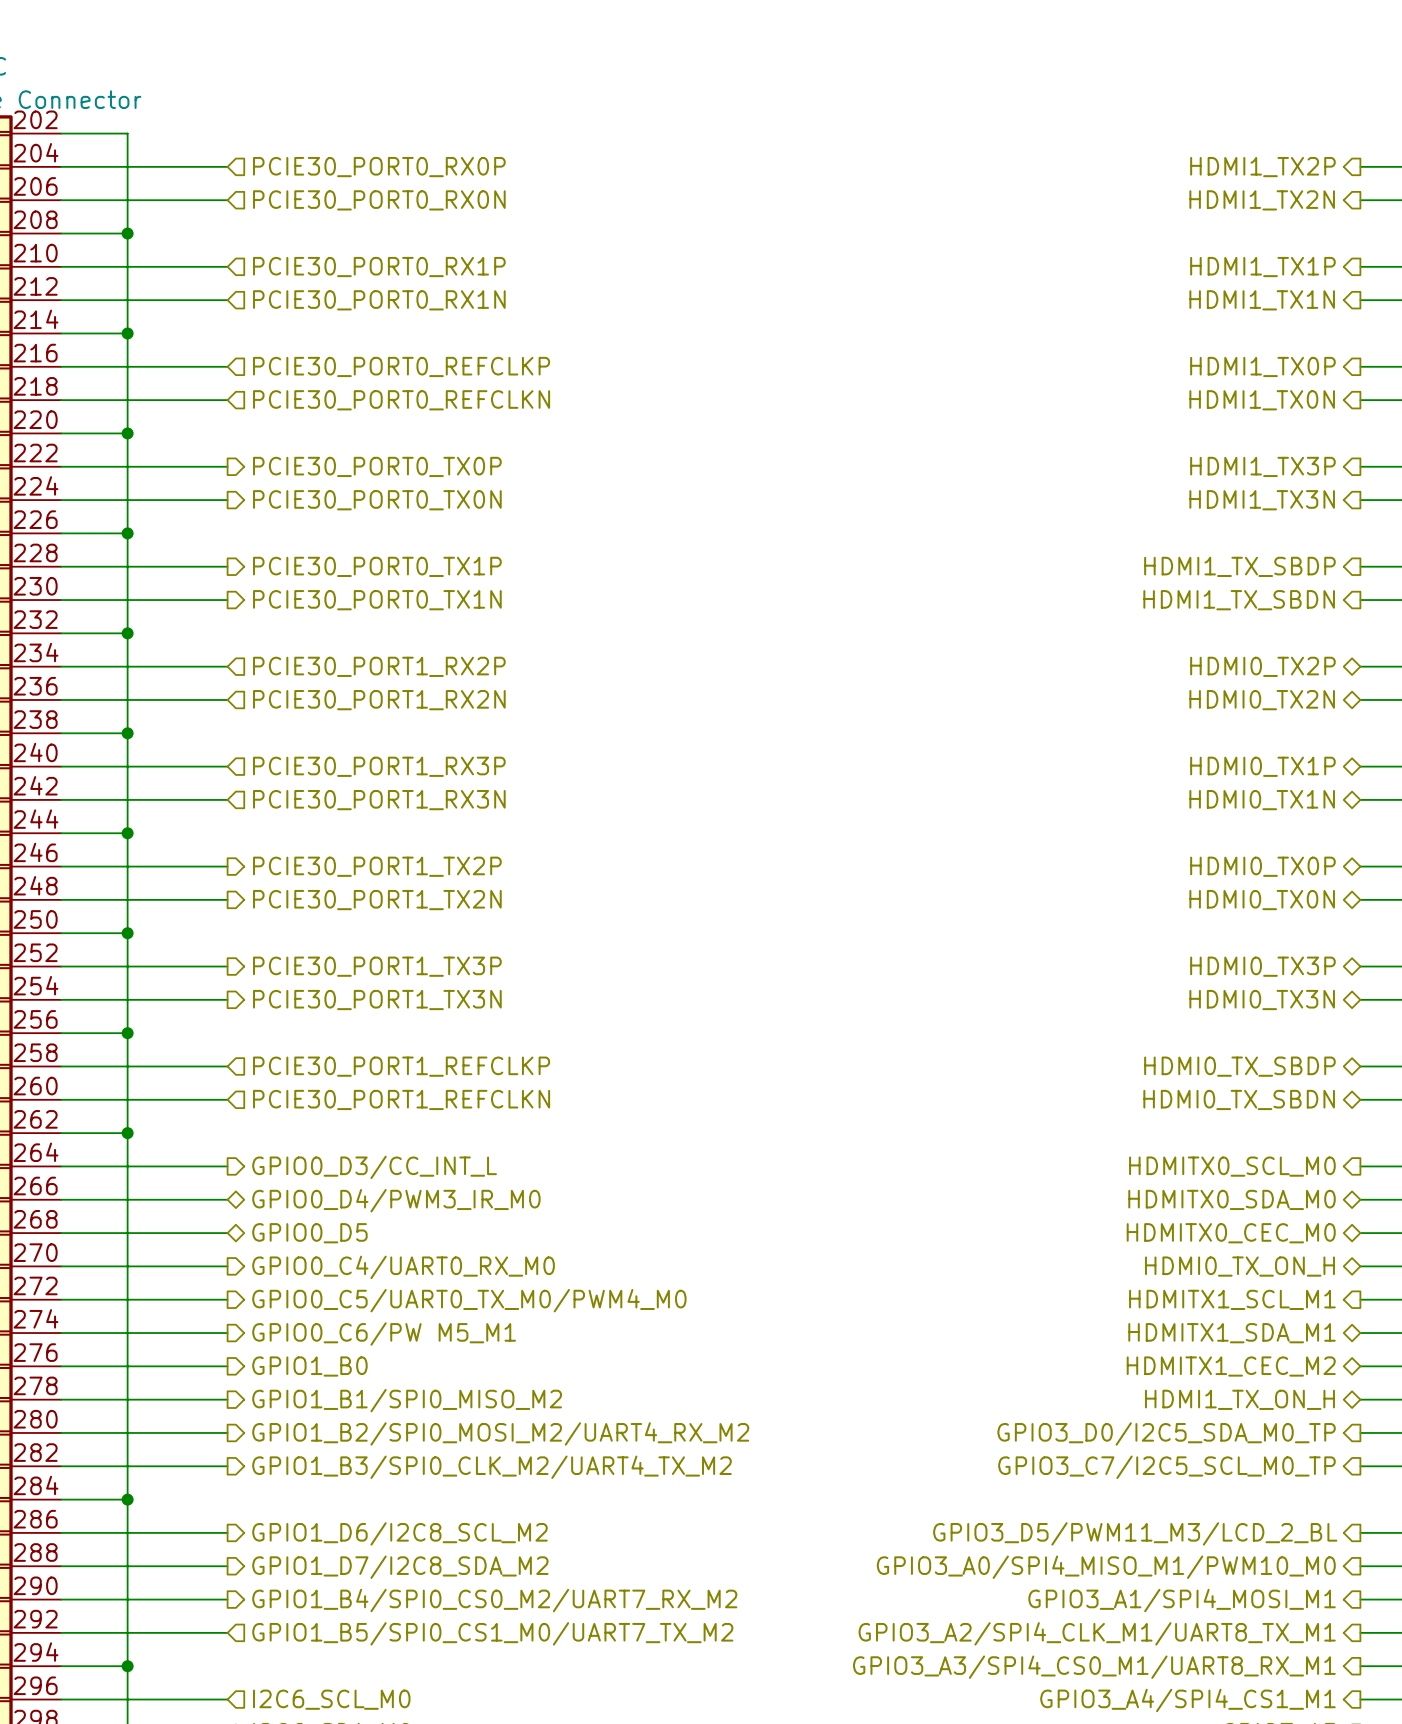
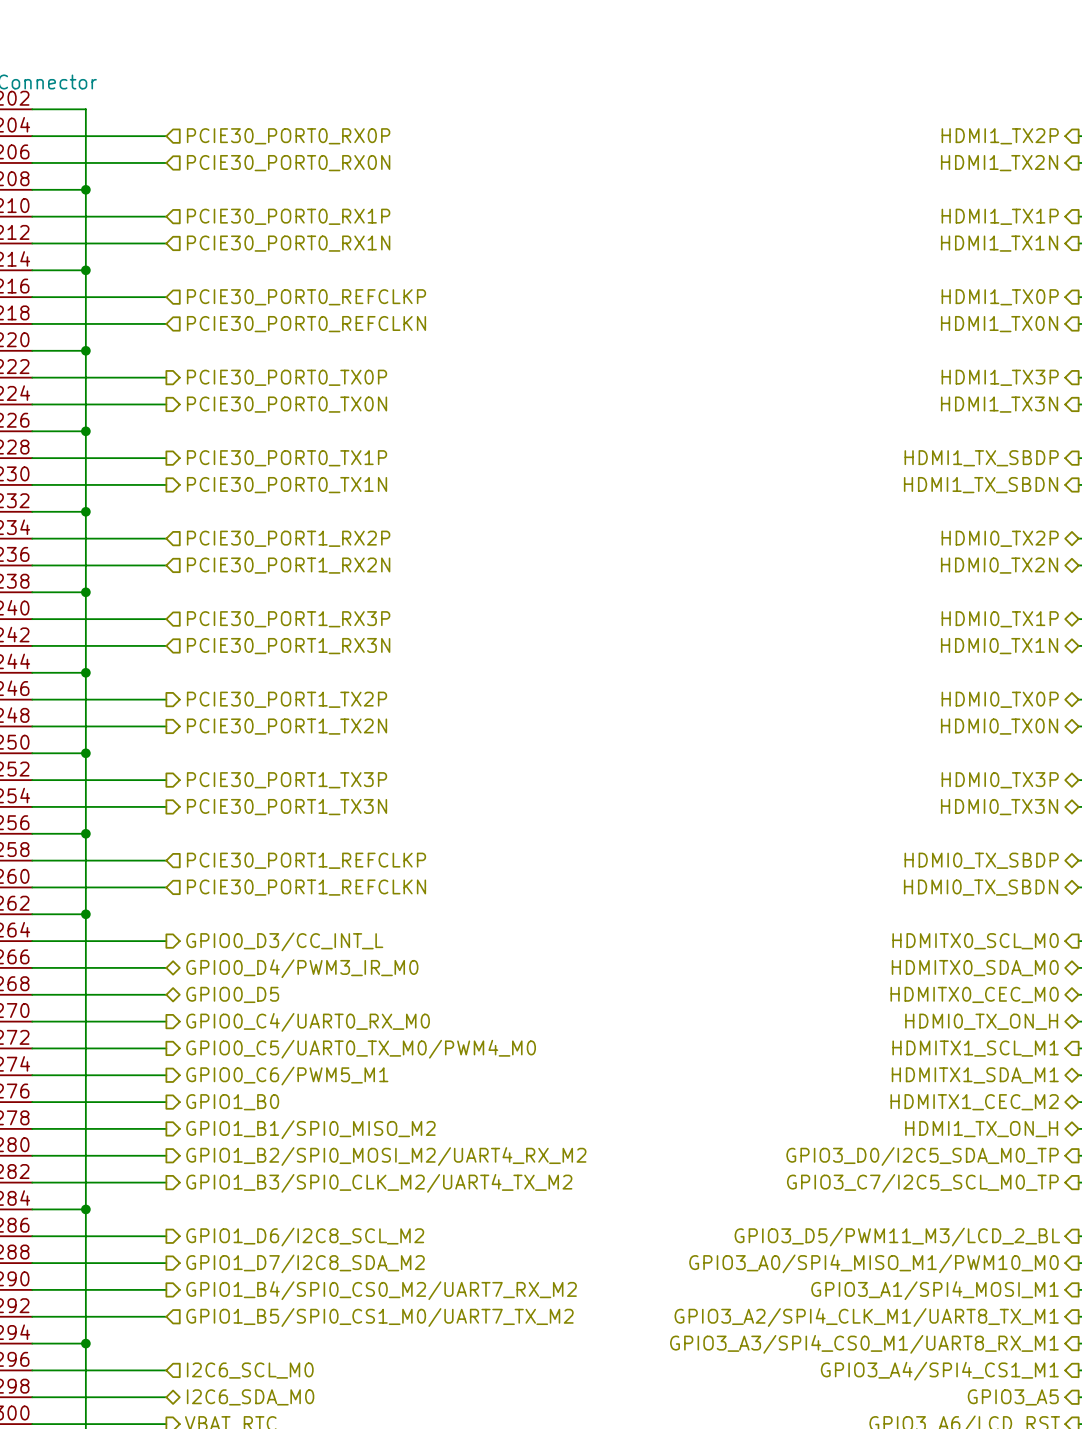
hierarchical label: GPIO0_C6/PW M5_M1 (384, 1333) -> GPIO0_C6/PWM5_M1 (287, 1076)

